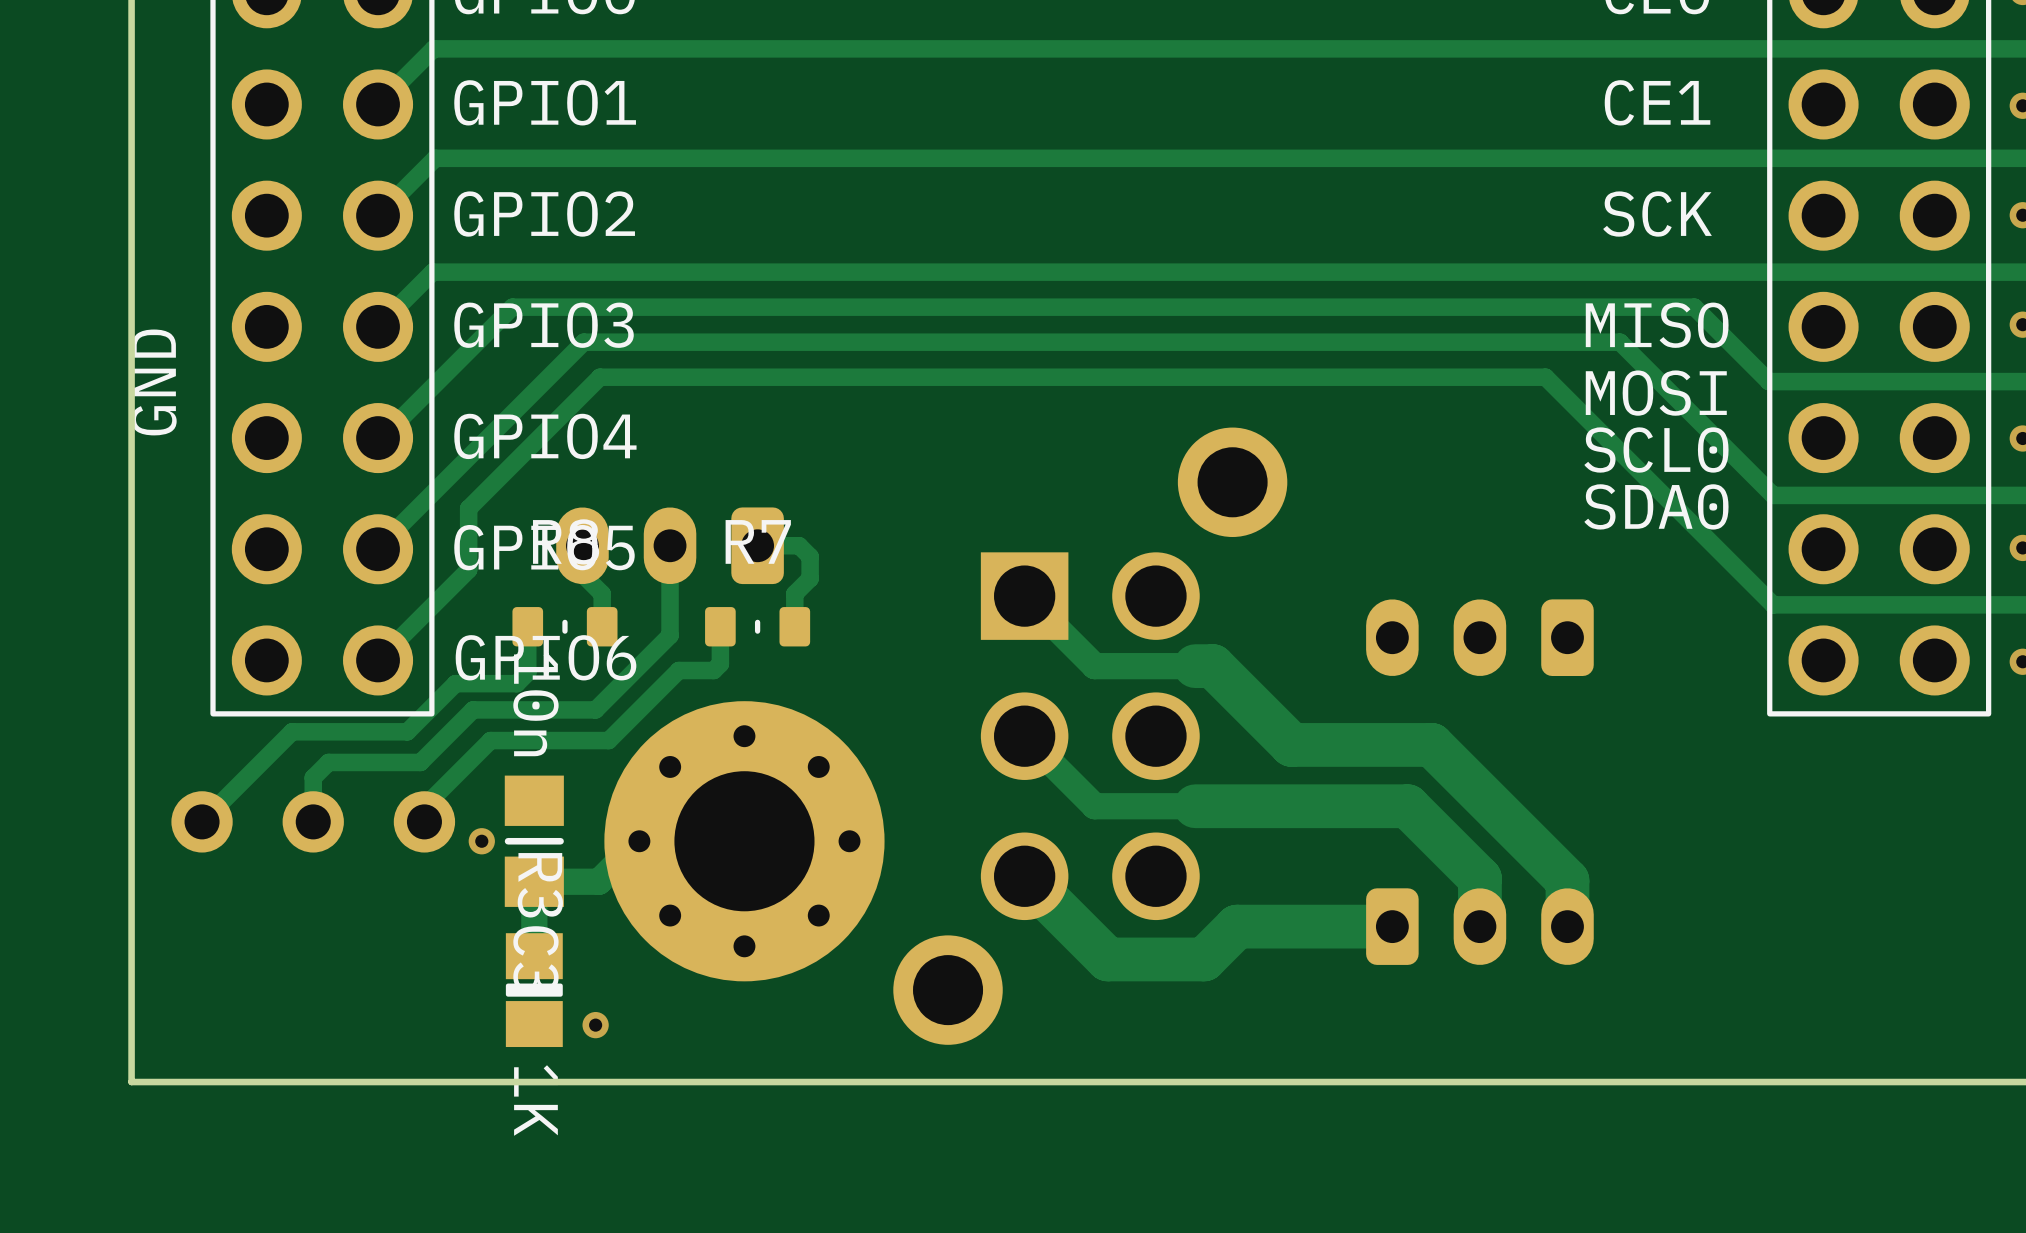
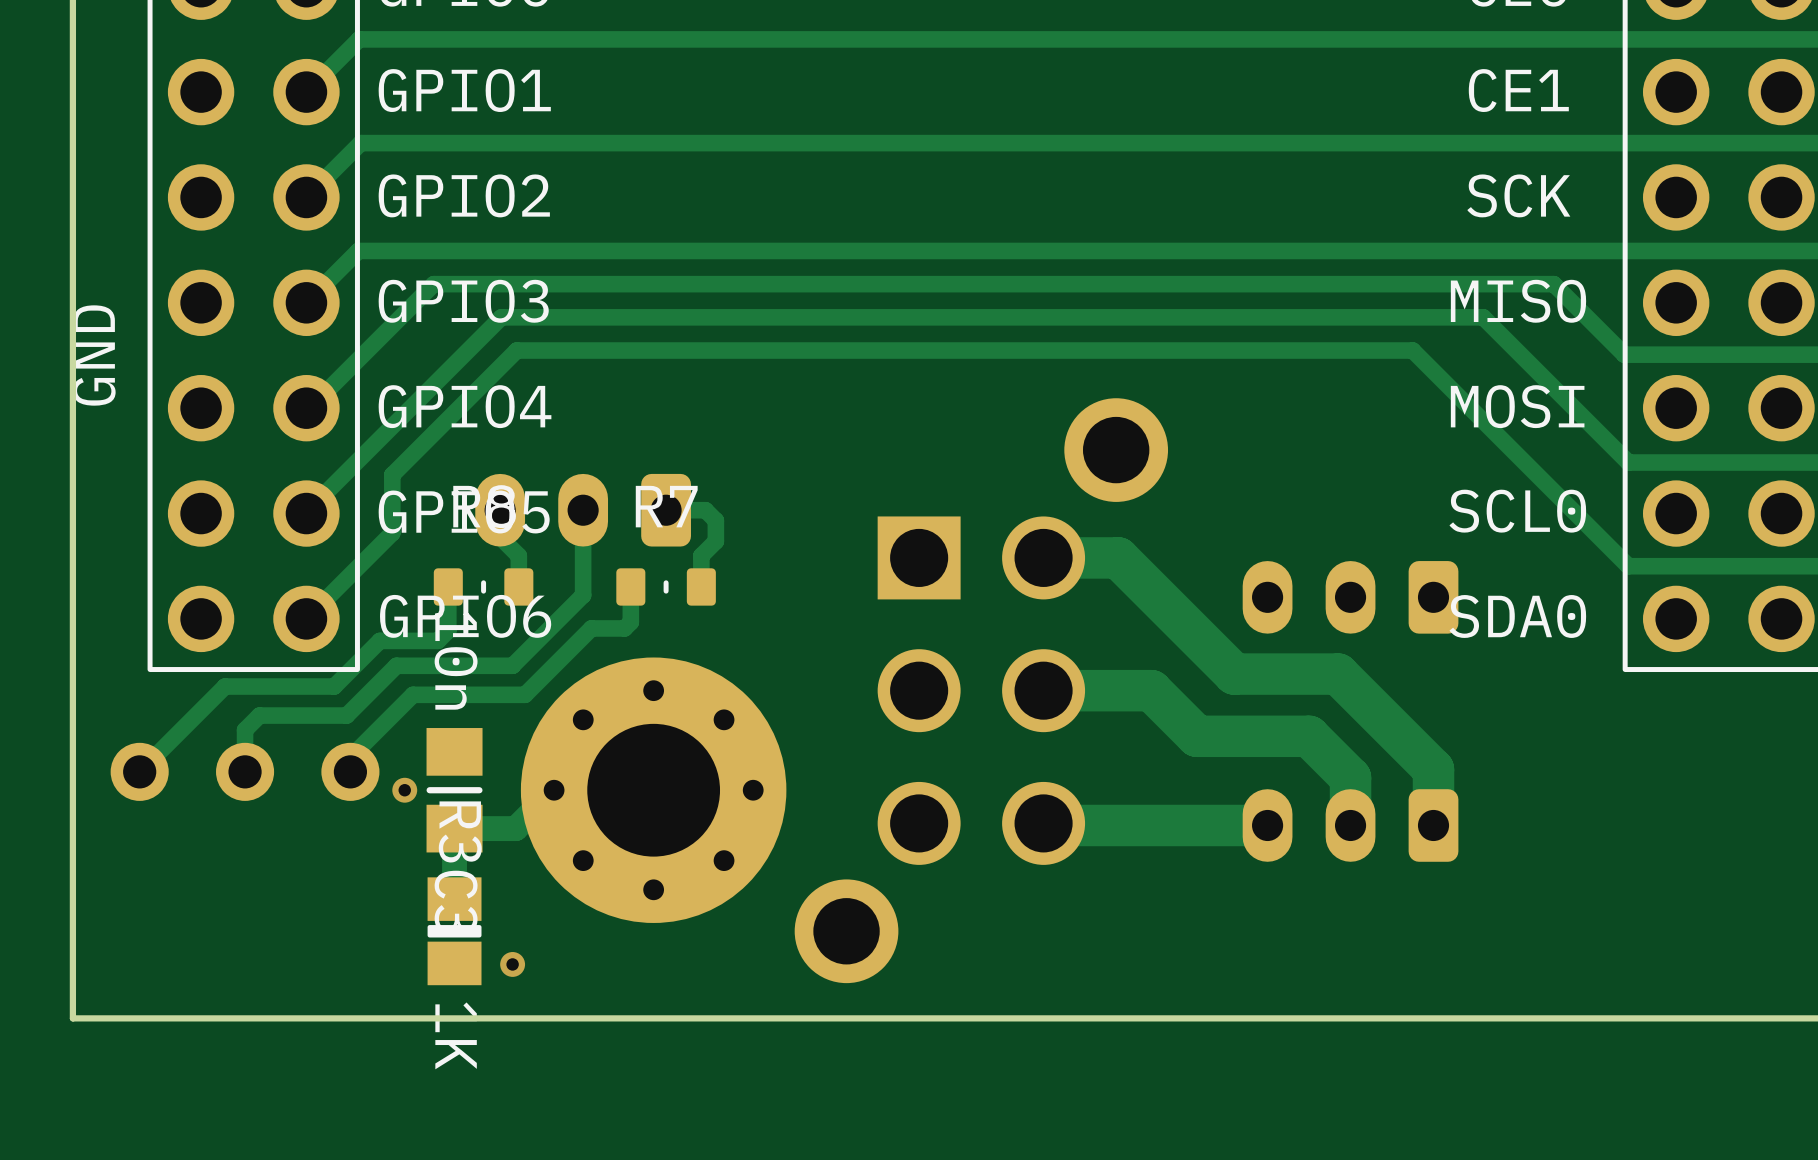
part text position: MOSI (1656, 393) -> MOSI (1517, 406)
part text position: SCL0 (1656, 450) -> SCL0 (1517, 511)
part text position: SDA0 (1656, 506) -> SDA0 (1517, 616)
track: (1024, 596) (1094, 666) (1212, 666) (1291, 744) (1431, 744) (1567, 880) (1567, 926) -> none
track: none -> (1043, 557) (1118, 557) (1234, 674) (1338, 674) (1433, 769) (1433, 825)
track: (1024, 736) (1094, 806) (1407, 806) (1479, 878) (1479, 926) -> none
track: none -> (1043, 690) (1151, 690) (1197, 736) (1309, 736) (1350, 777) (1350, 825)
track: (1024, 876) (1107, 959) (1204, 959) (1236, 926) (1392, 926) -> none
track: none -> (1043, 823) (1045, 825) (1267, 825)
part rotation: 0° (1479, 926) -> 180° (1350, 825)

